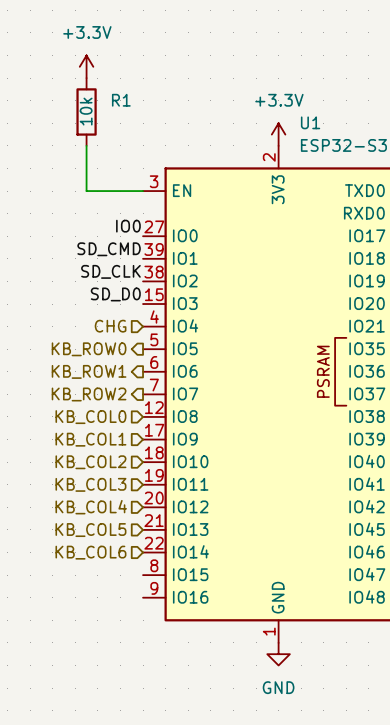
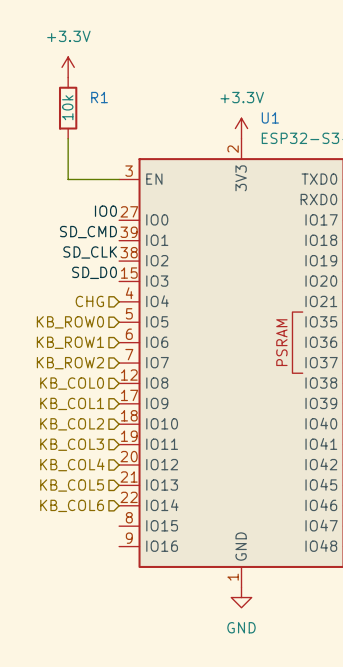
hierarchical label shape: output (89, 349) -> input (70, 322)
hierarchical label shape: output (89, 371) -> input (70, 342)
hierarchical label shape: output (89, 394) -> input (70, 363)

